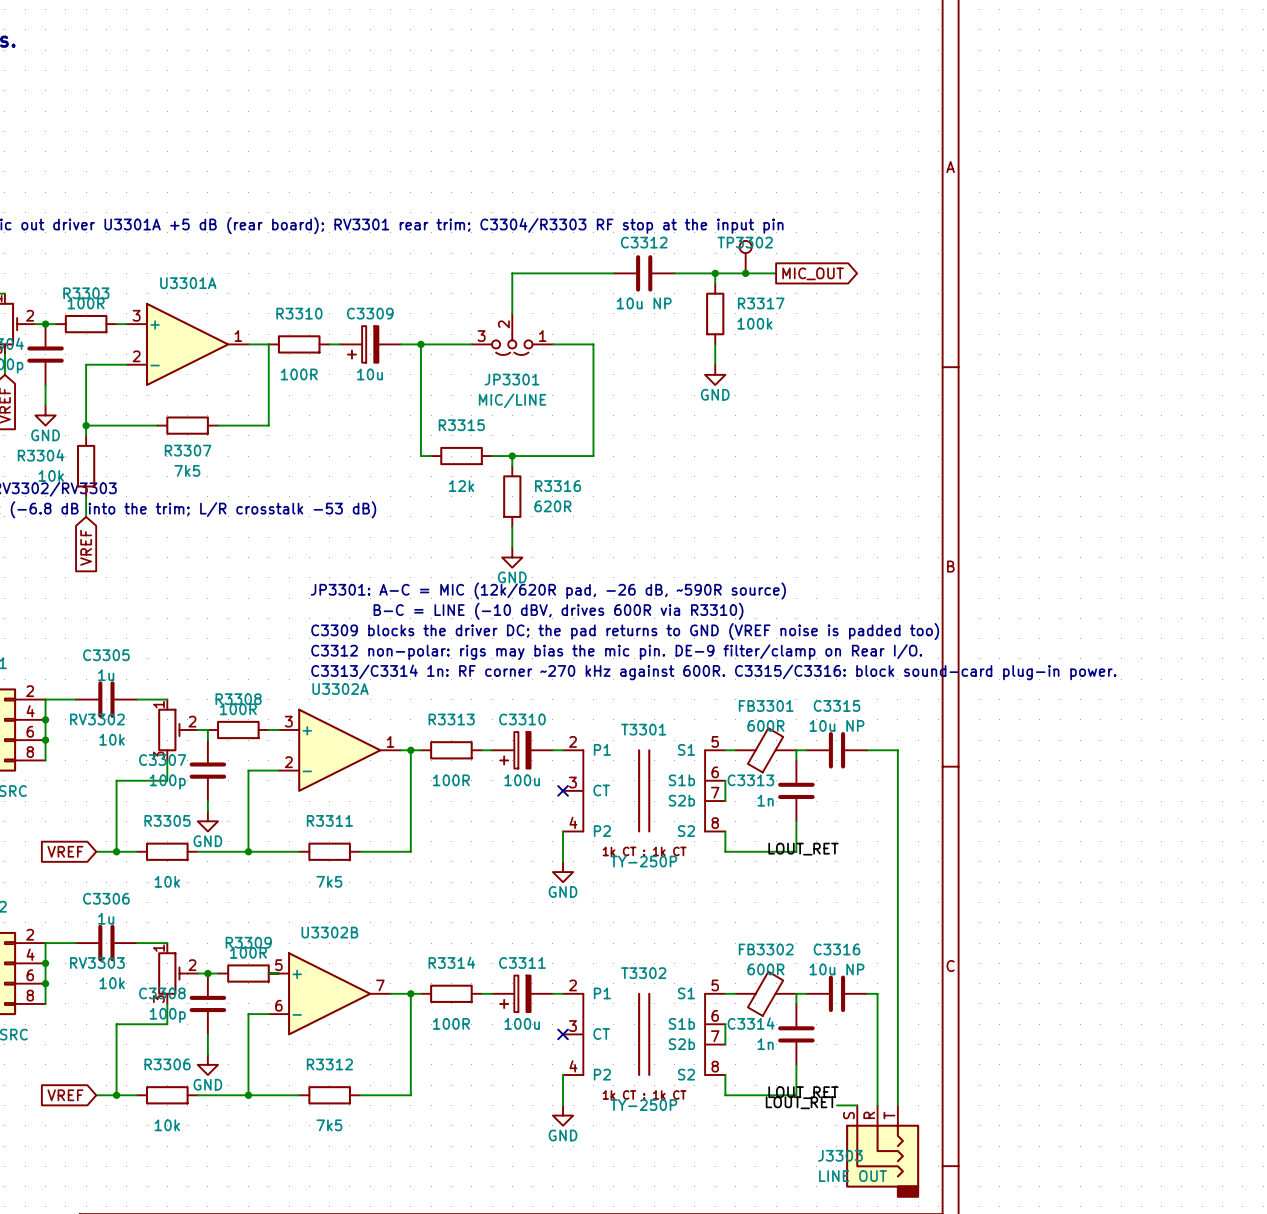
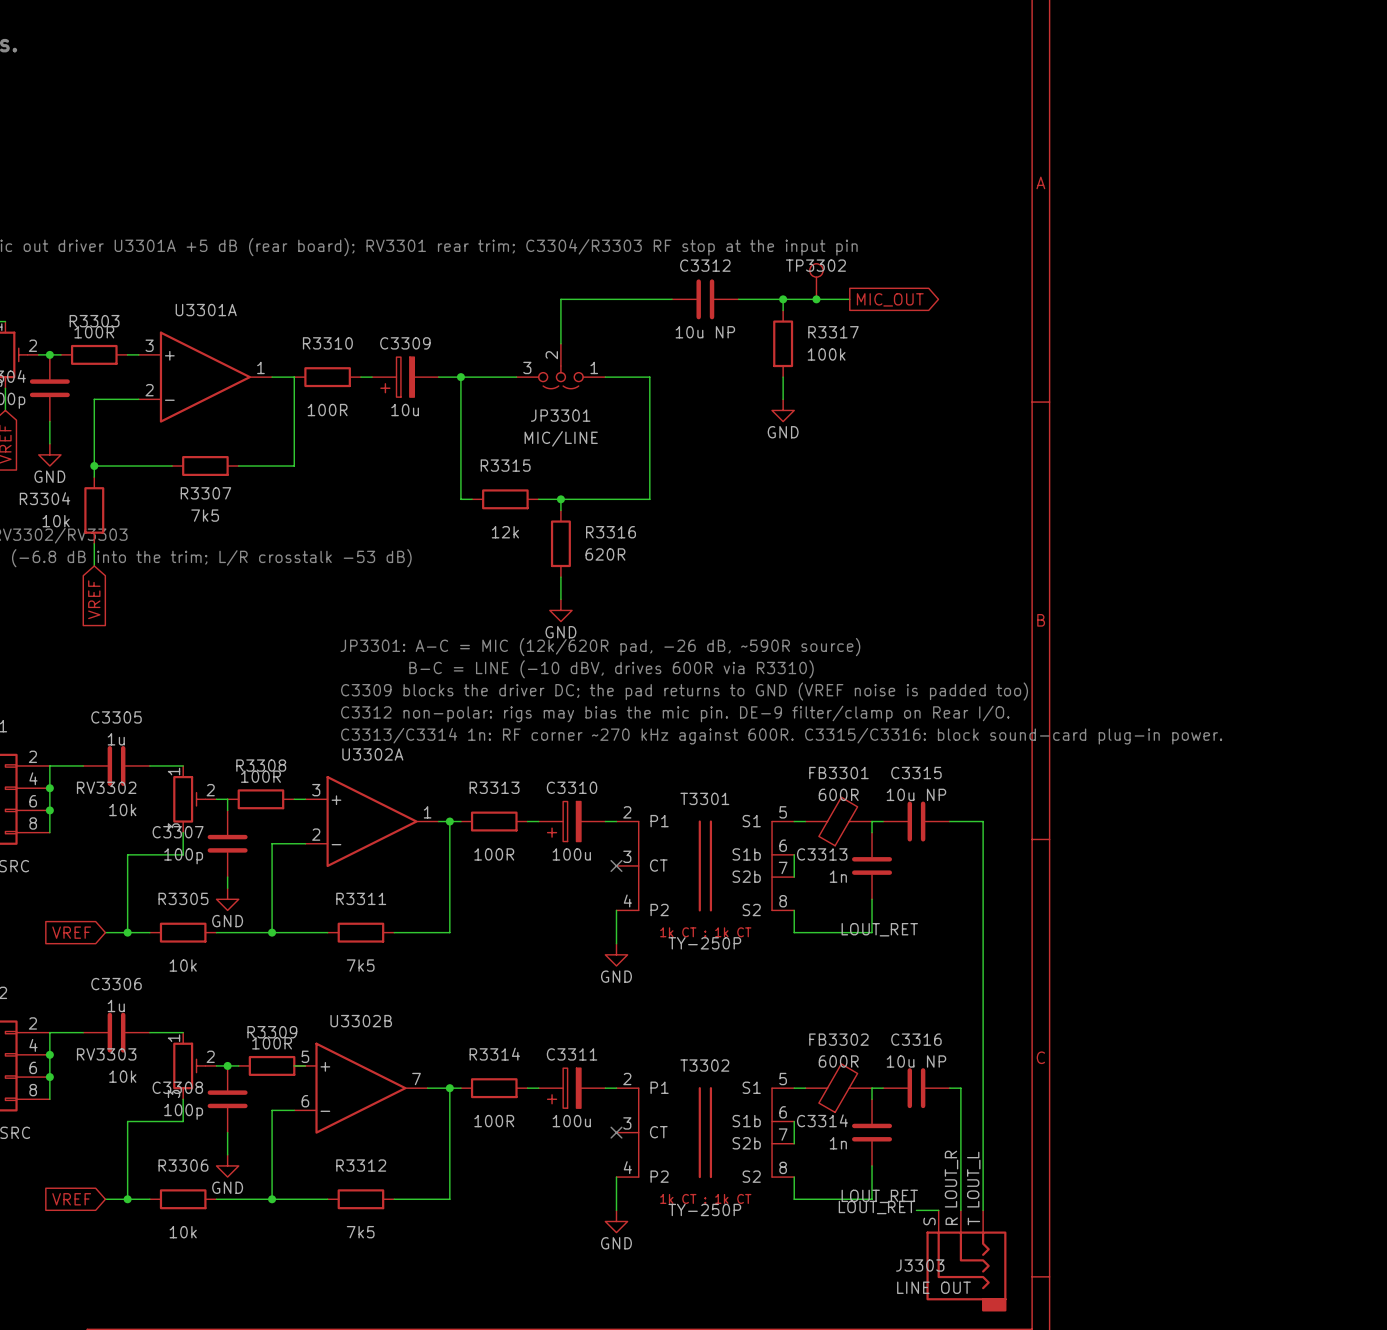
label: none -> LOUT_R (951, 1179)
label: none -> LOUT_L (973, 1179)

